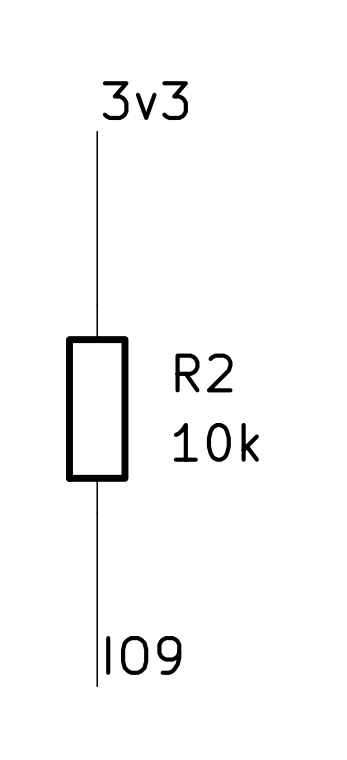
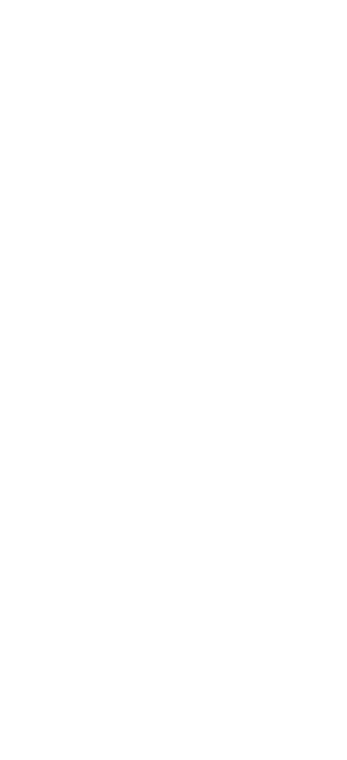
label: 3v3 (145, 100) -> none
wire: (97, 131) (97, 304) -> none
R2: 10k (97, 408) -> none
wire: (97, 512) (97, 686) -> none
label: IO9 (143, 655) -> none

